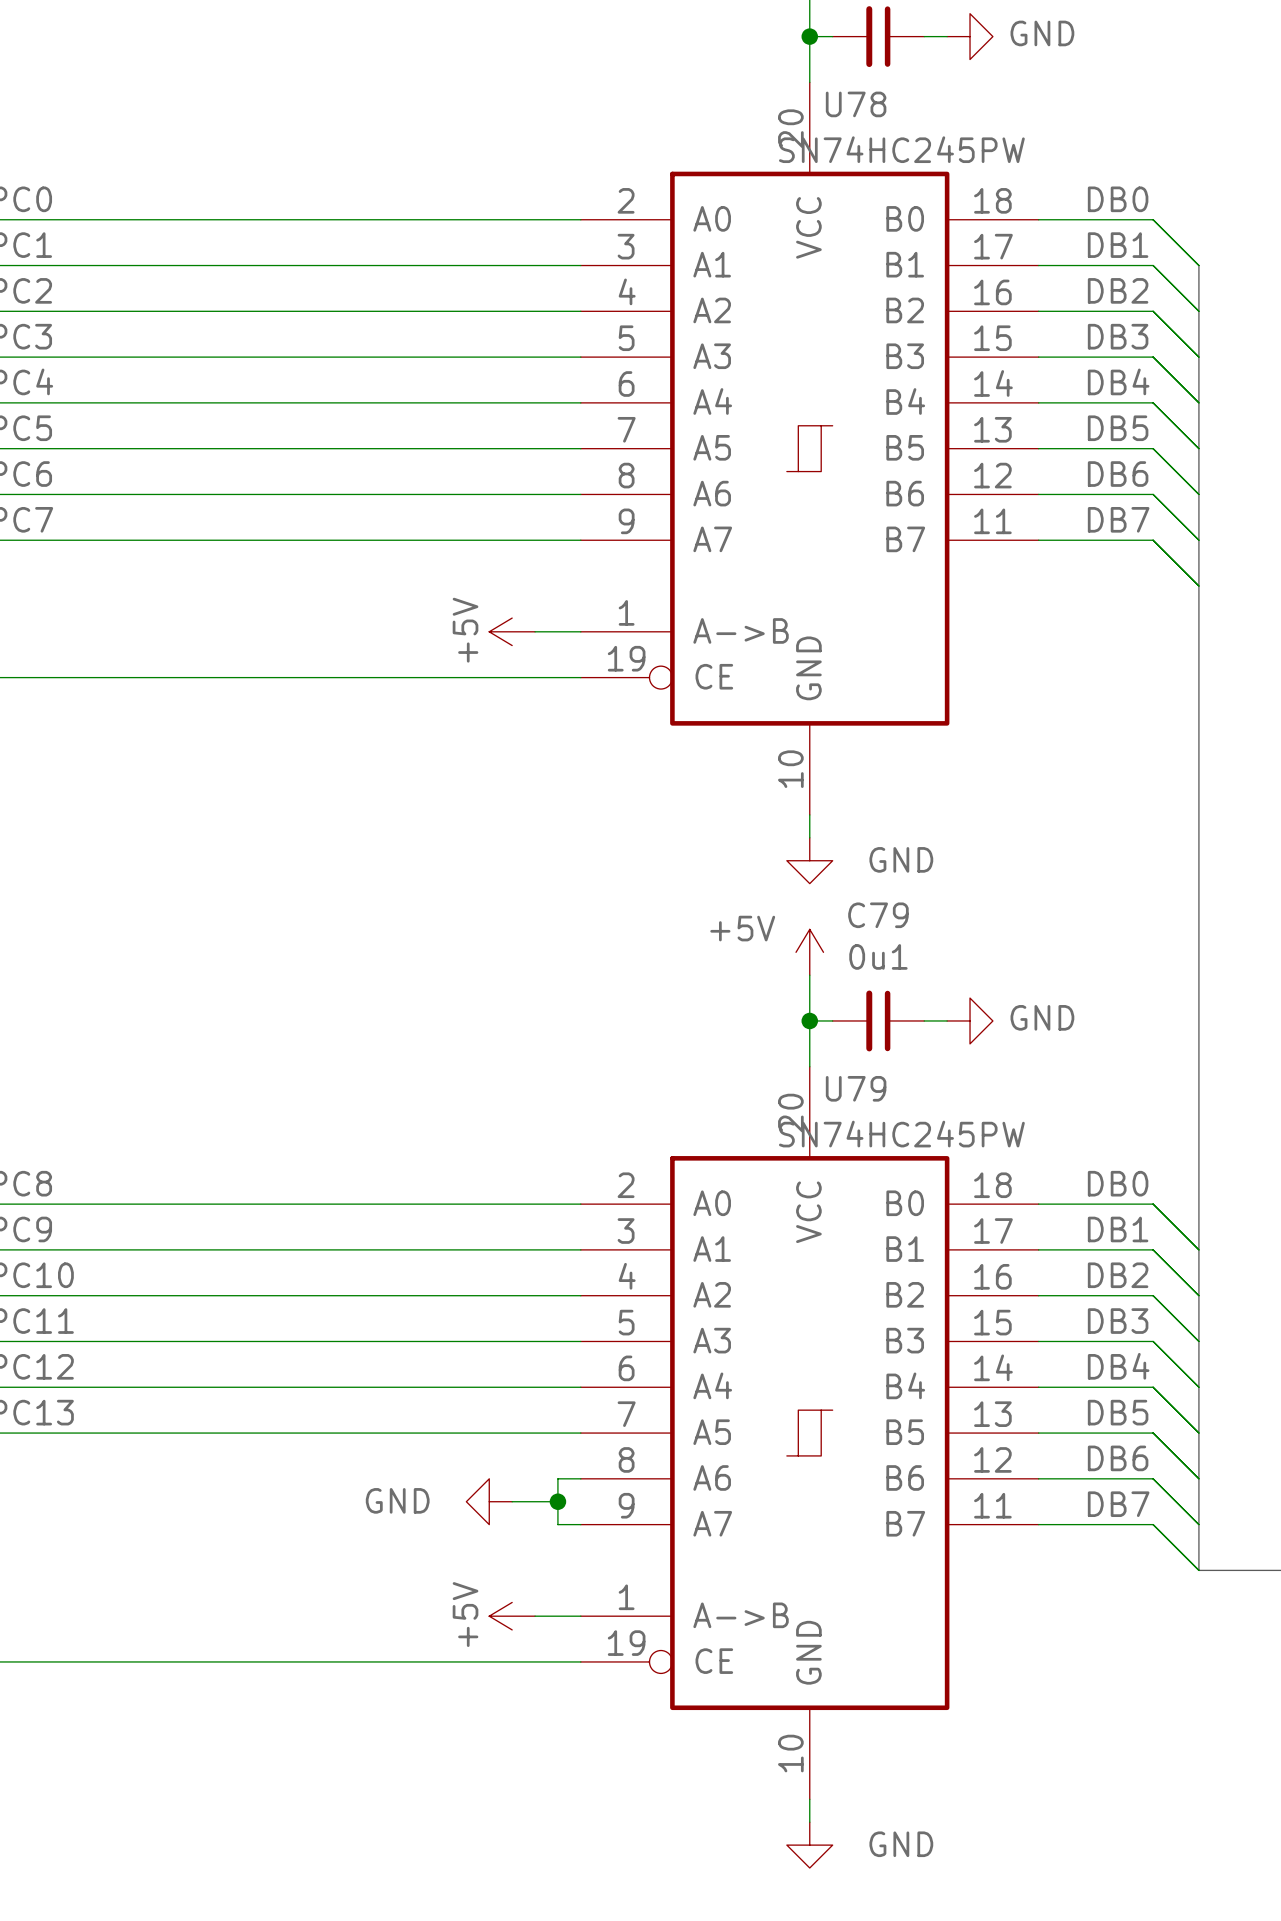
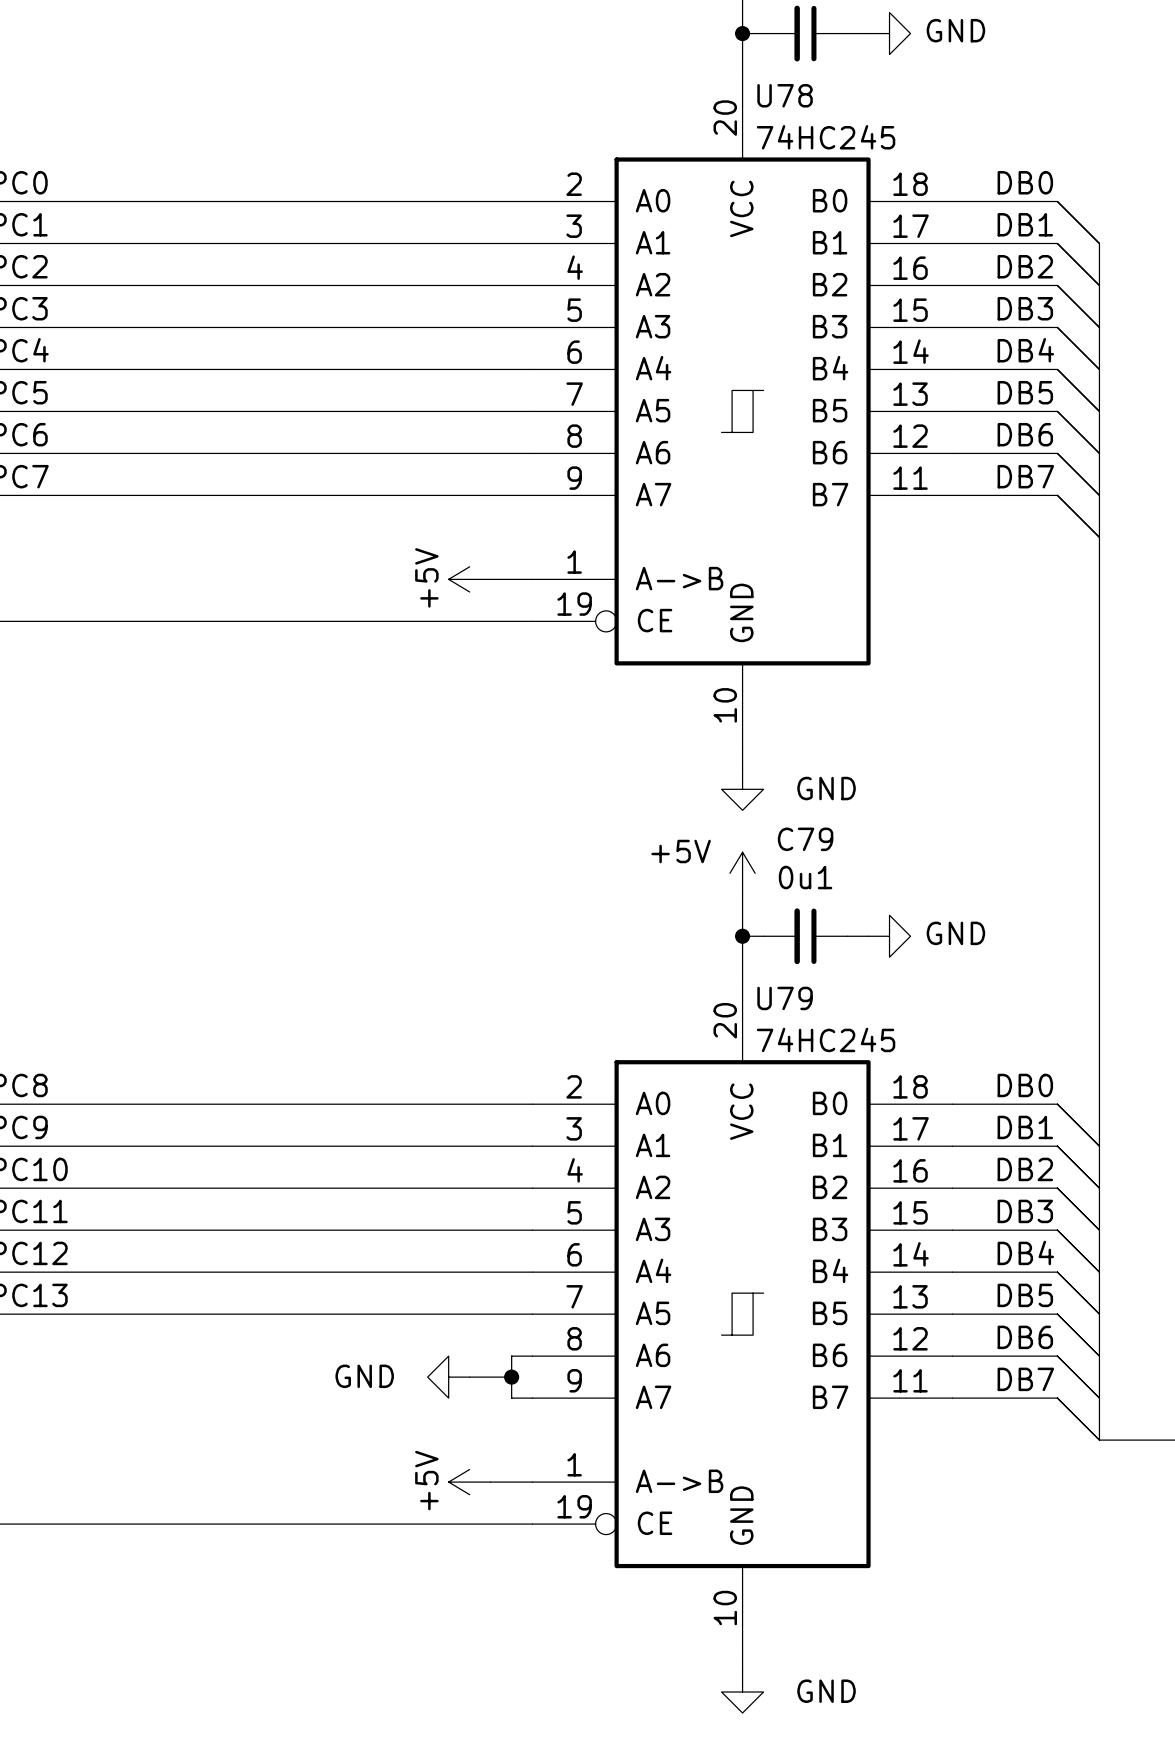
U78 value: SN74HC245PW (901, 149) -> 74HC245 (826, 137)
U79 value: SN74HC245PW (901, 1134) -> 74HC245 (826, 1039)

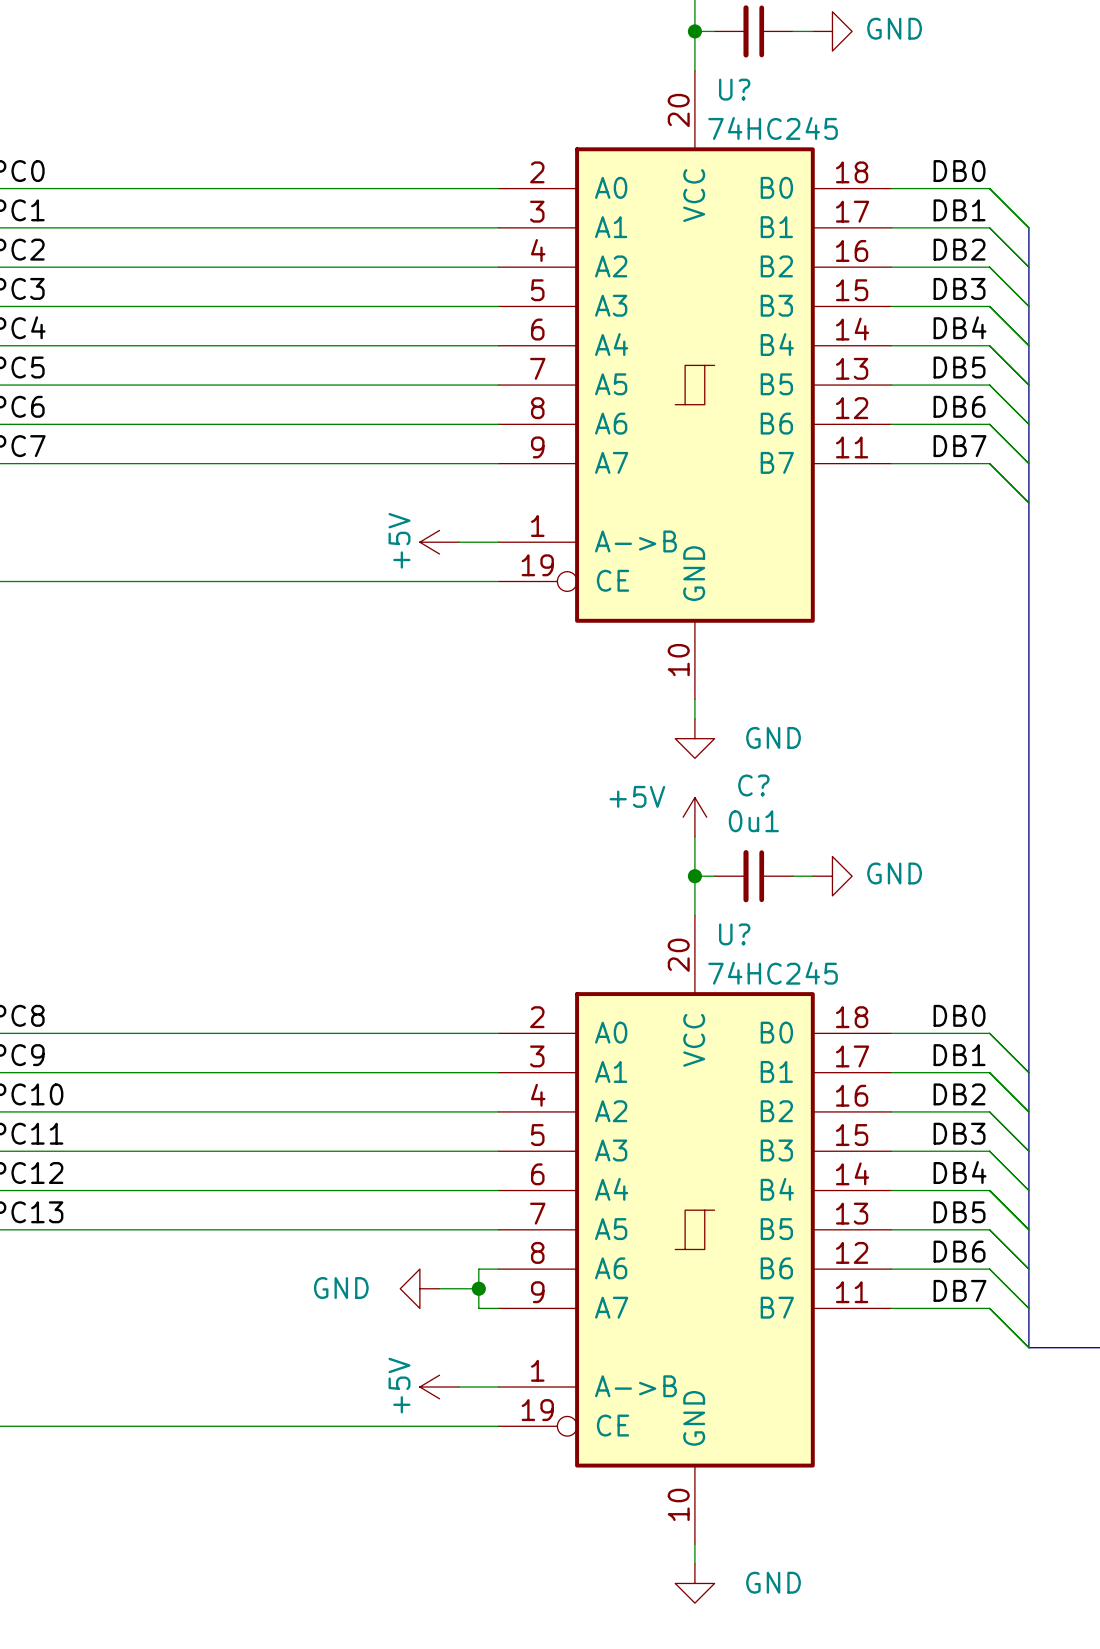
U78 name: U78 (785, 95) -> U? (734, 89)
C79 name: C79 (805, 839) -> C? (753, 785)
U79 name: U79 (785, 998) -> U? (734, 934)

